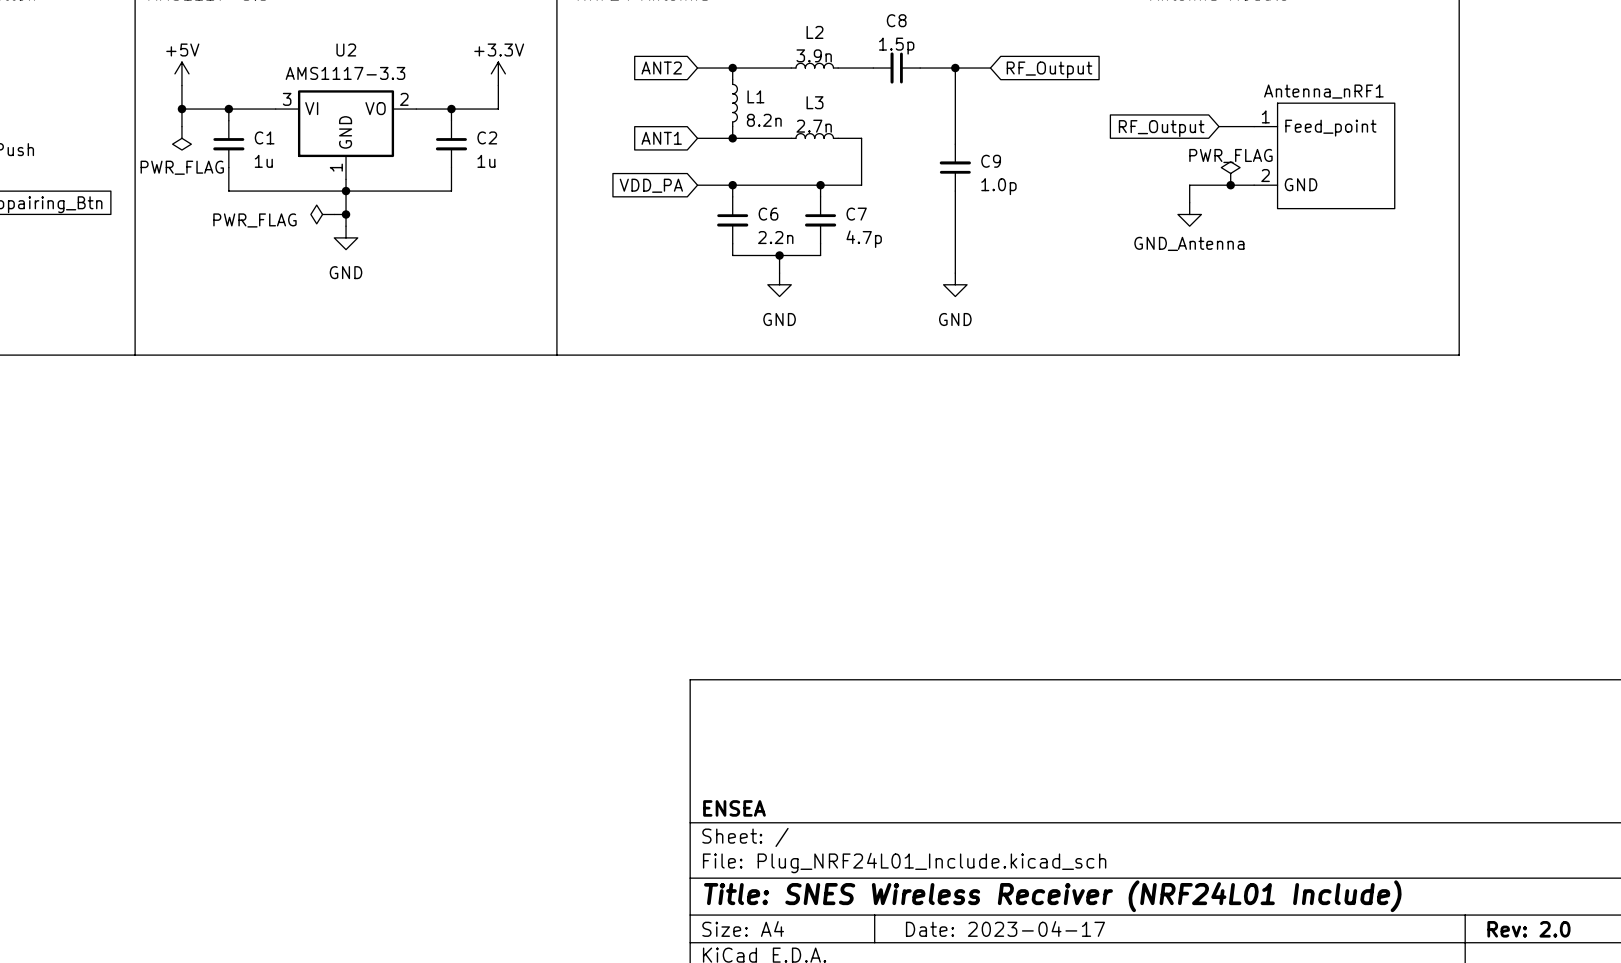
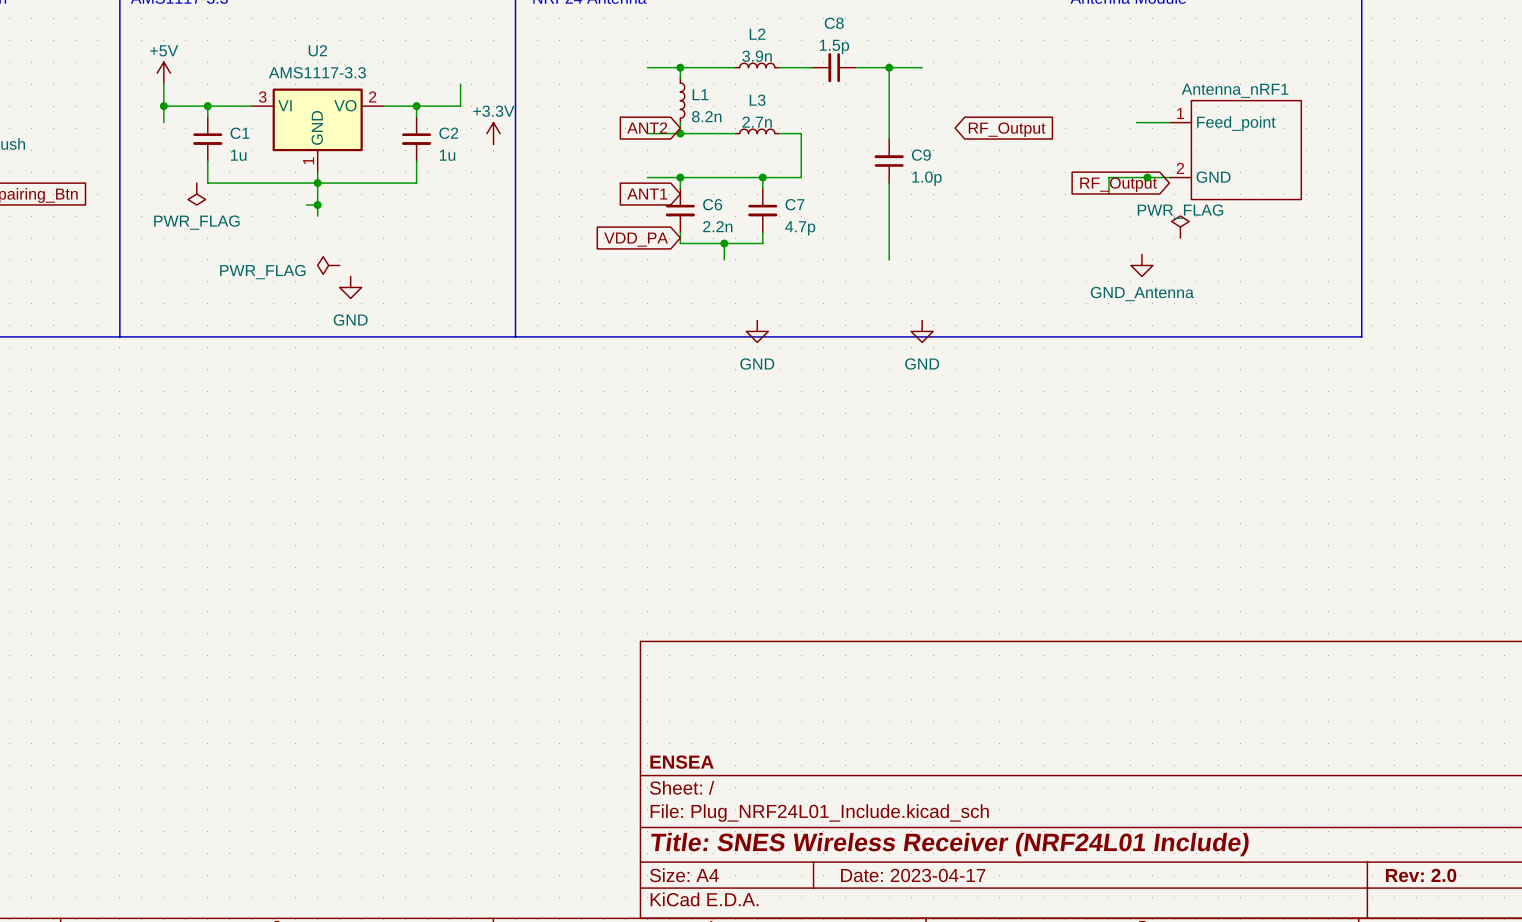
global label position: ANT2 (661, 68) -> ANT2 (647, 128)
global label position: RF_Output (1049, 69) -> RF_Output (1007, 129)
power symbol position: +3.3V (498, 73) -> +3.3V (493, 133)
global label position: RF_Output (1161, 128) -> RF_Output (1118, 184)
power symbol: PWR_FLAG (181, 138) -> none
global label position: ANT1 (661, 138) -> ANT1 (647, 194)
power symbol position: PWR_FLAG (1230, 173) -> PWR_FLAG (1180, 227)
global label position: VDD_PA (651, 185) -> VDD_PA (636, 239)
power symbol: none -> PWR_FLAG (196, 194)
power symbol: PWR_FLAG (322, 214) -> none
power symbol position: GND_Antenna (1189, 214) -> GND_Antenna (1141, 265)
power symbol position: GND (346, 237) -> GND (350, 287)
power symbol: none -> PWR_FLAG (328, 265)
power symbol position: GND (779, 284) -> GND (757, 331)
power symbol position: GND (955, 284) -> GND (922, 331)

